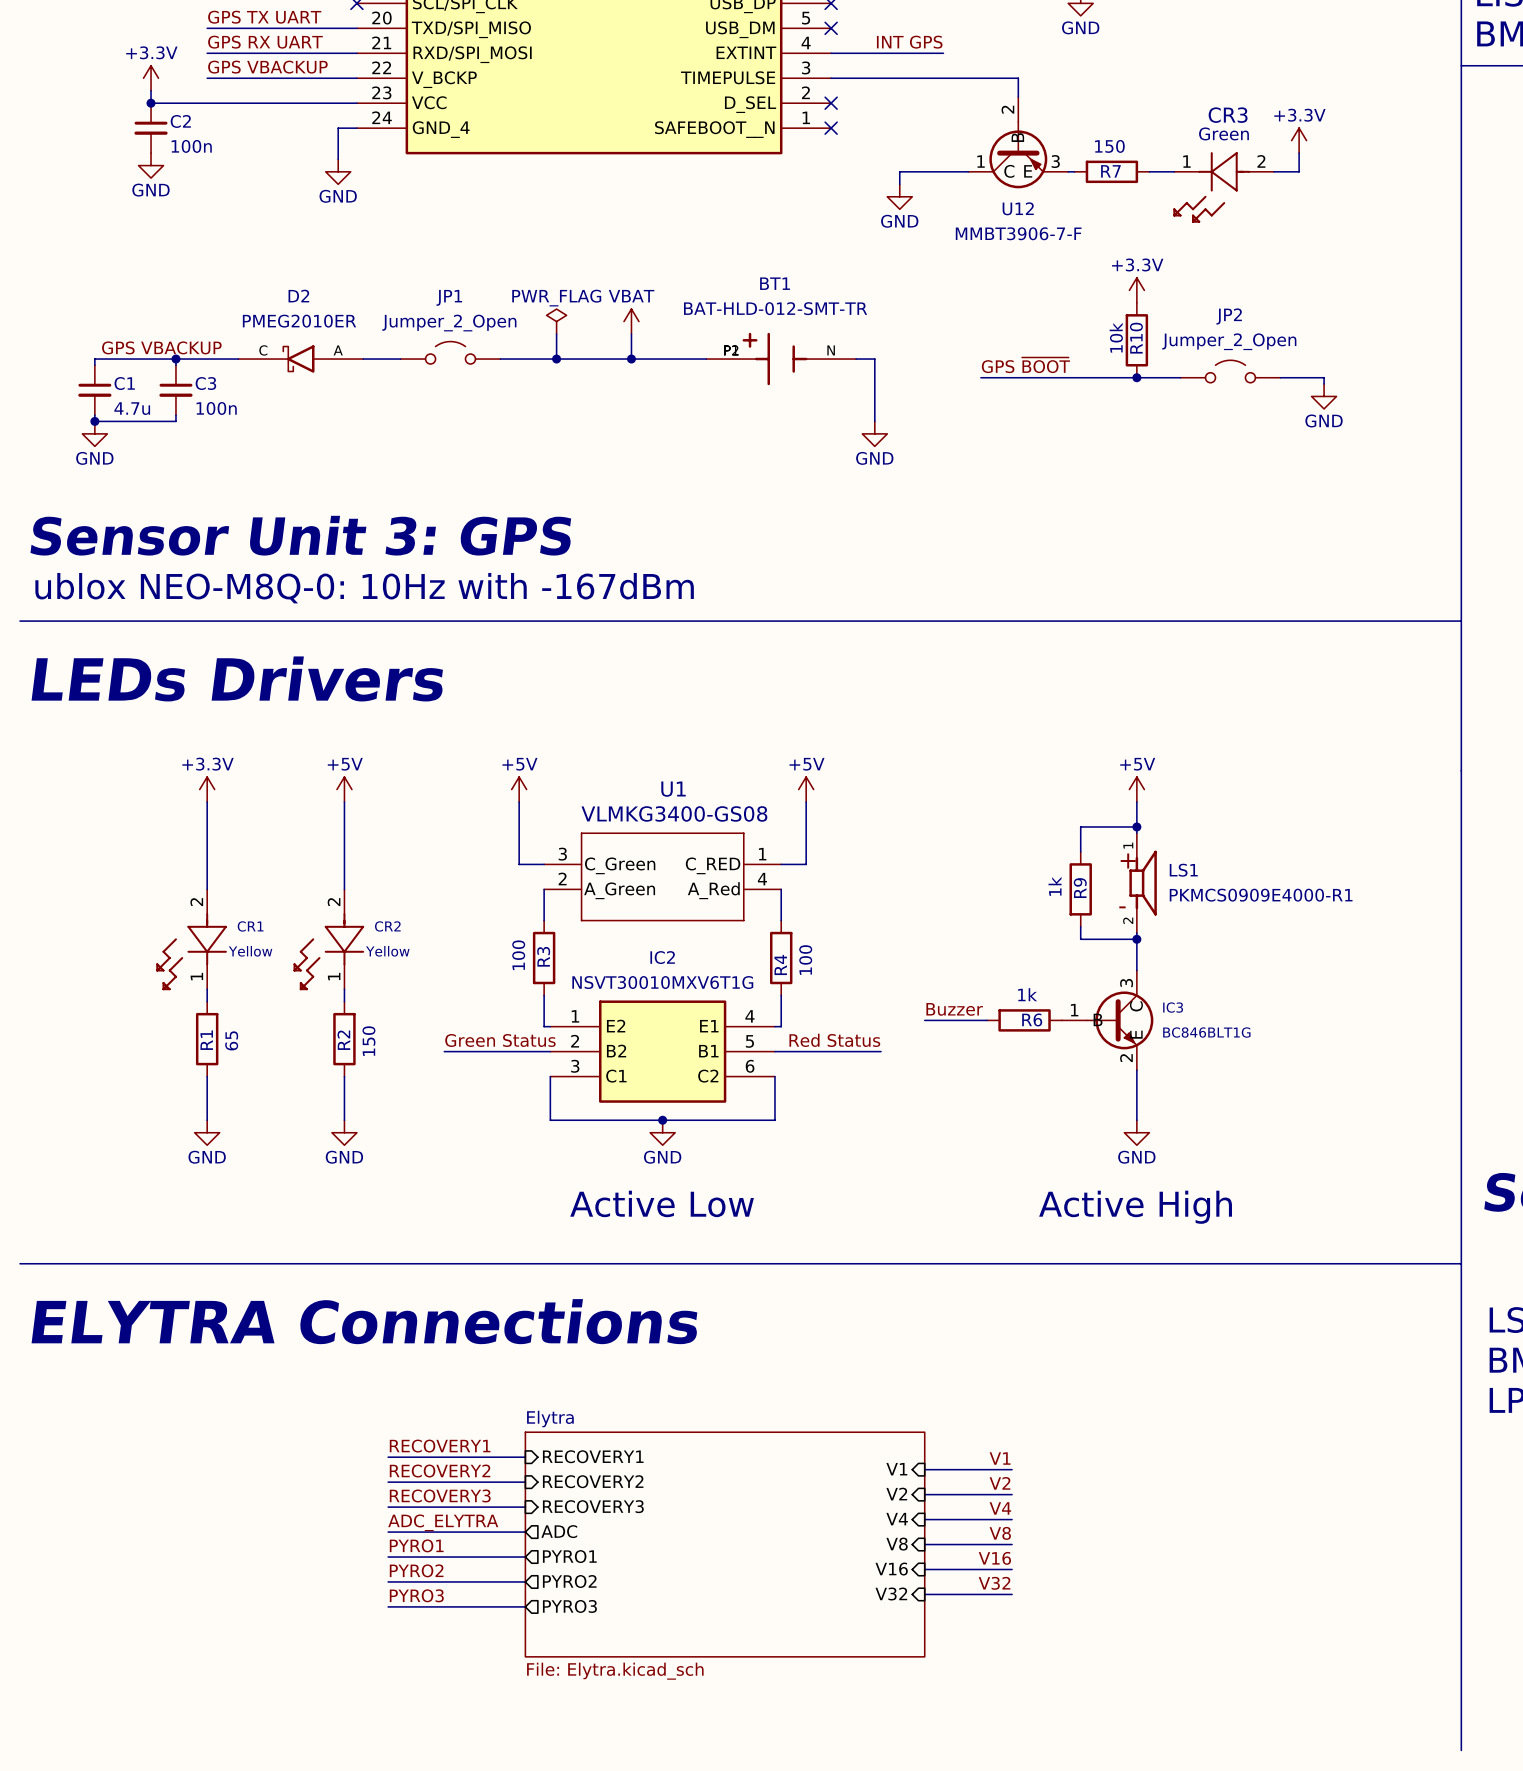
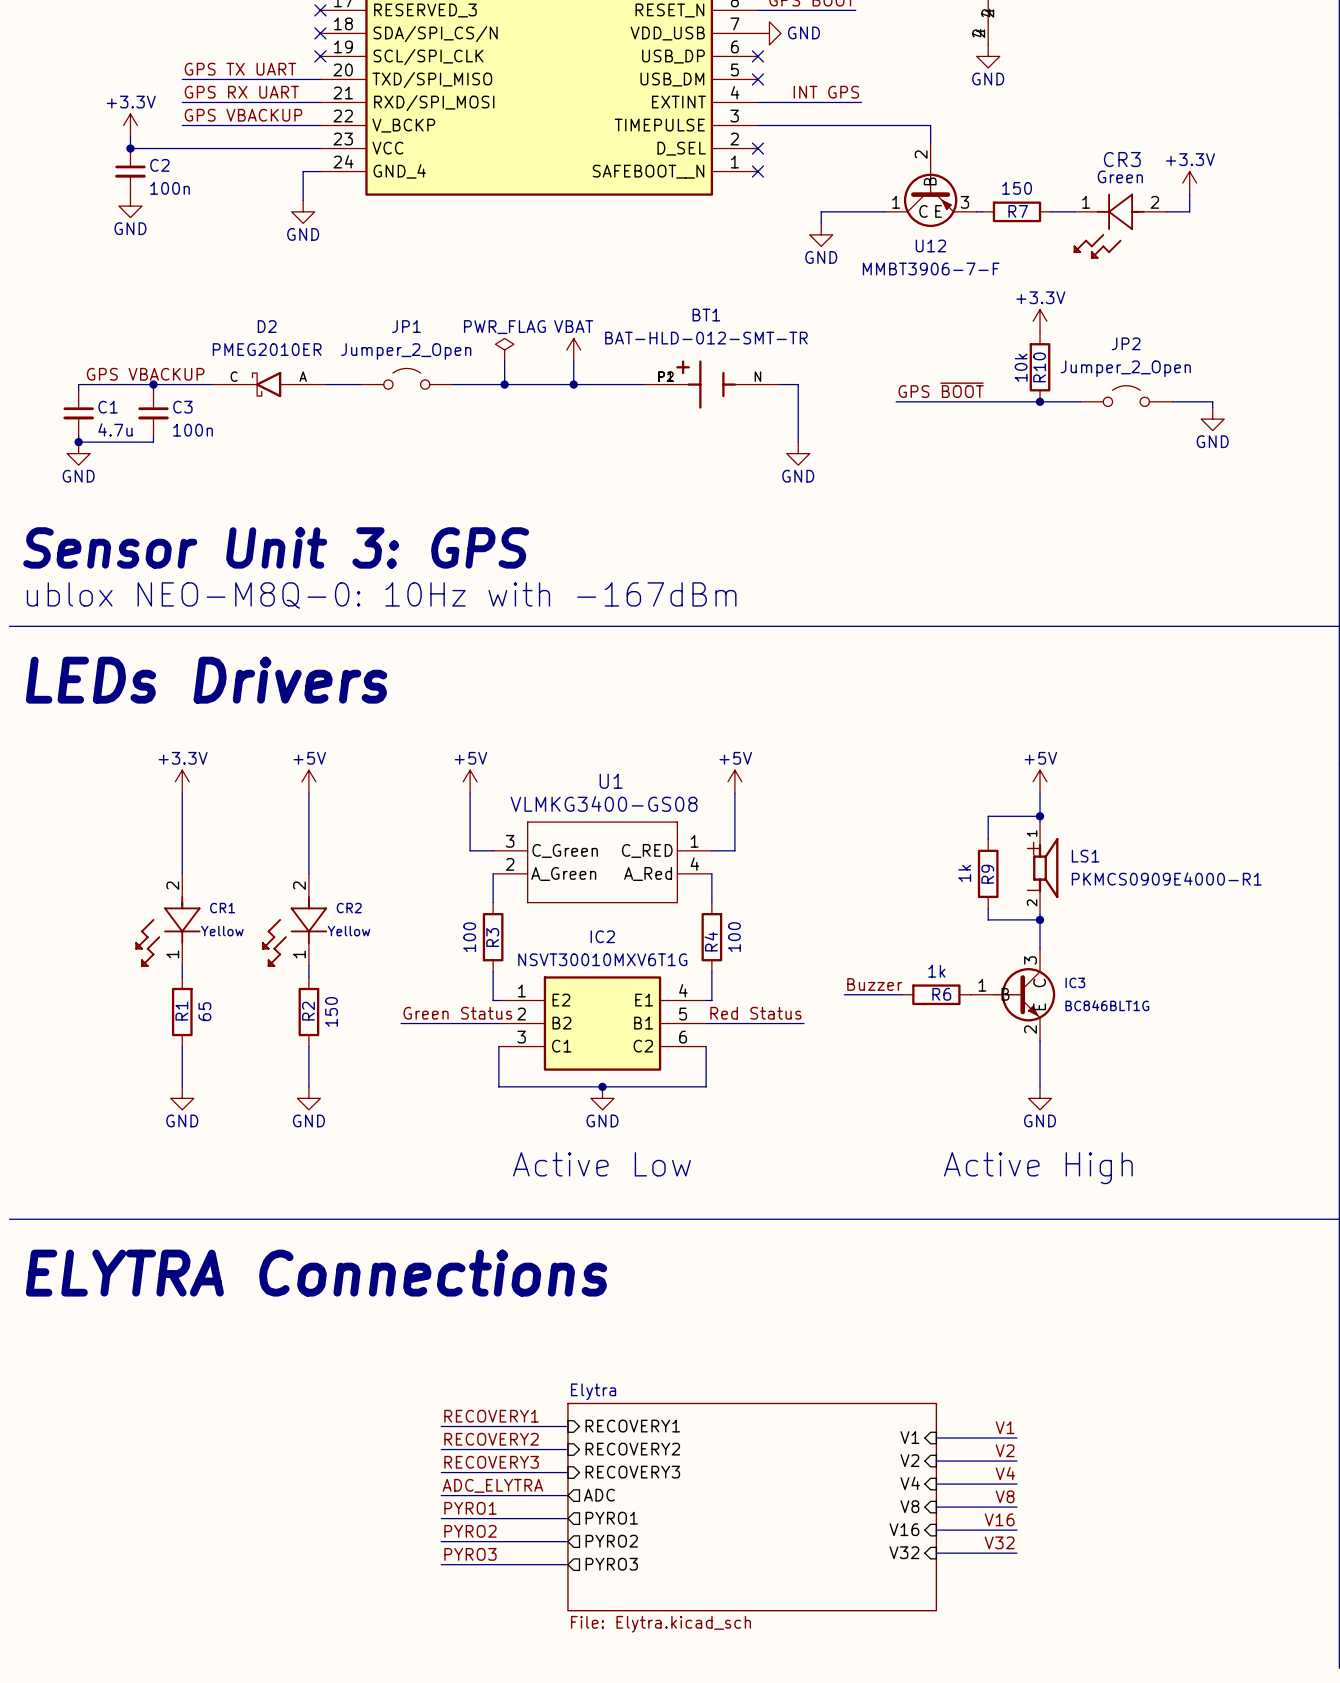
label position: RECOVERY1 (440, 1446) -> RECOVERY1 (491, 1416)
sheet pin position: RECOVERY1 (593, 1456) -> RECOVERY1 (632, 1426)
wire: (388, 1457) (525, 1457) -> (441, 1426) (567, 1426)
label position: V1 (1000, 1458) -> V1 (1005, 1427)
sheet pin position: V1 (896, 1469) -> V1 (909, 1437)
wire: (924, 1469) (1012, 1469) -> (936, 1438) (1016, 1438)
label position: RECOVERY2 (440, 1471) -> RECOVERY2 (491, 1439)
sheet pin position: RECOVERY2 (593, 1481) -> RECOVERY2 (632, 1449)
wire: (388, 1482) (525, 1482) -> (441, 1449) (567, 1449)
label position: V2 (999, 1483) -> V2 (1005, 1450)
sheet pin position: V2 (896, 1494) -> V2 (909, 1460)
wire: (924, 1494) (1012, 1494) -> (936, 1461) (1016, 1461)
label position: RECOVERY3 (440, 1495) -> RECOVERY3 (491, 1462)
sheet pin position: RECOVERY3 (593, 1506) -> RECOVERY3 (632, 1472)
wire: (388, 1507) (525, 1507) -> (441, 1472) (567, 1472)
label position: V4 (1000, 1508) -> V4 (1005, 1473)
sheet pin position: V4 (897, 1519) -> V4 (910, 1483)
wire: (924, 1519) (1012, 1519) -> (936, 1484) (1016, 1484)
label position: ADC_ELYTRA (443, 1522) -> ADC_ELYTRA (492, 1485)
sheet pin position: ADC (559, 1531) -> ADC (599, 1495)
wire: (388, 1532) (525, 1532) -> (441, 1495) (567, 1495)
label position: V8 (1000, 1533) -> V8 (1005, 1496)
sheet Elytra position: (725, 1544) -> (752, 1507)
sheet pin position: V8 (897, 1544) -> V8 (909, 1506)
wire: (924, 1544) (1012, 1544) -> (936, 1507) (1016, 1507)
label position: PYRO1 (416, 1545) -> PYRO1 (470, 1508)
sheet pin position: PYRO1 (569, 1556) -> PYRO1 (611, 1518)
wire: (388, 1557) (525, 1557) -> (441, 1518) (567, 1518)
label position: V16 (994, 1558) -> V16 (999, 1519)
sheet pin position: V16 (891, 1569) -> V16 (904, 1529)
wire: (924, 1569) (1012, 1569) -> (936, 1530) (1016, 1530)
label position: PYRO2 (416, 1570) -> PYRO2 (470, 1531)
wire: (388, 1581) (525, 1581) -> (441, 1541) (567, 1541)
sheet pin position: PYRO2 (569, 1581) -> PYRO2 (611, 1541)
label position: V32 (994, 1583) -> V32 (999, 1542)
sheet pin position: V32 (891, 1594) -> V32 (904, 1552)
wire: (924, 1594) (1012, 1594) -> (936, 1553) (1016, 1553)
label position: PYRO3 (416, 1595) -> PYRO3 (470, 1554)
wire: (388, 1606) (525, 1606) -> (441, 1564) (567, 1564)
sheet pin position: PYRO3 (569, 1606) -> PYRO3 (611, 1564)

